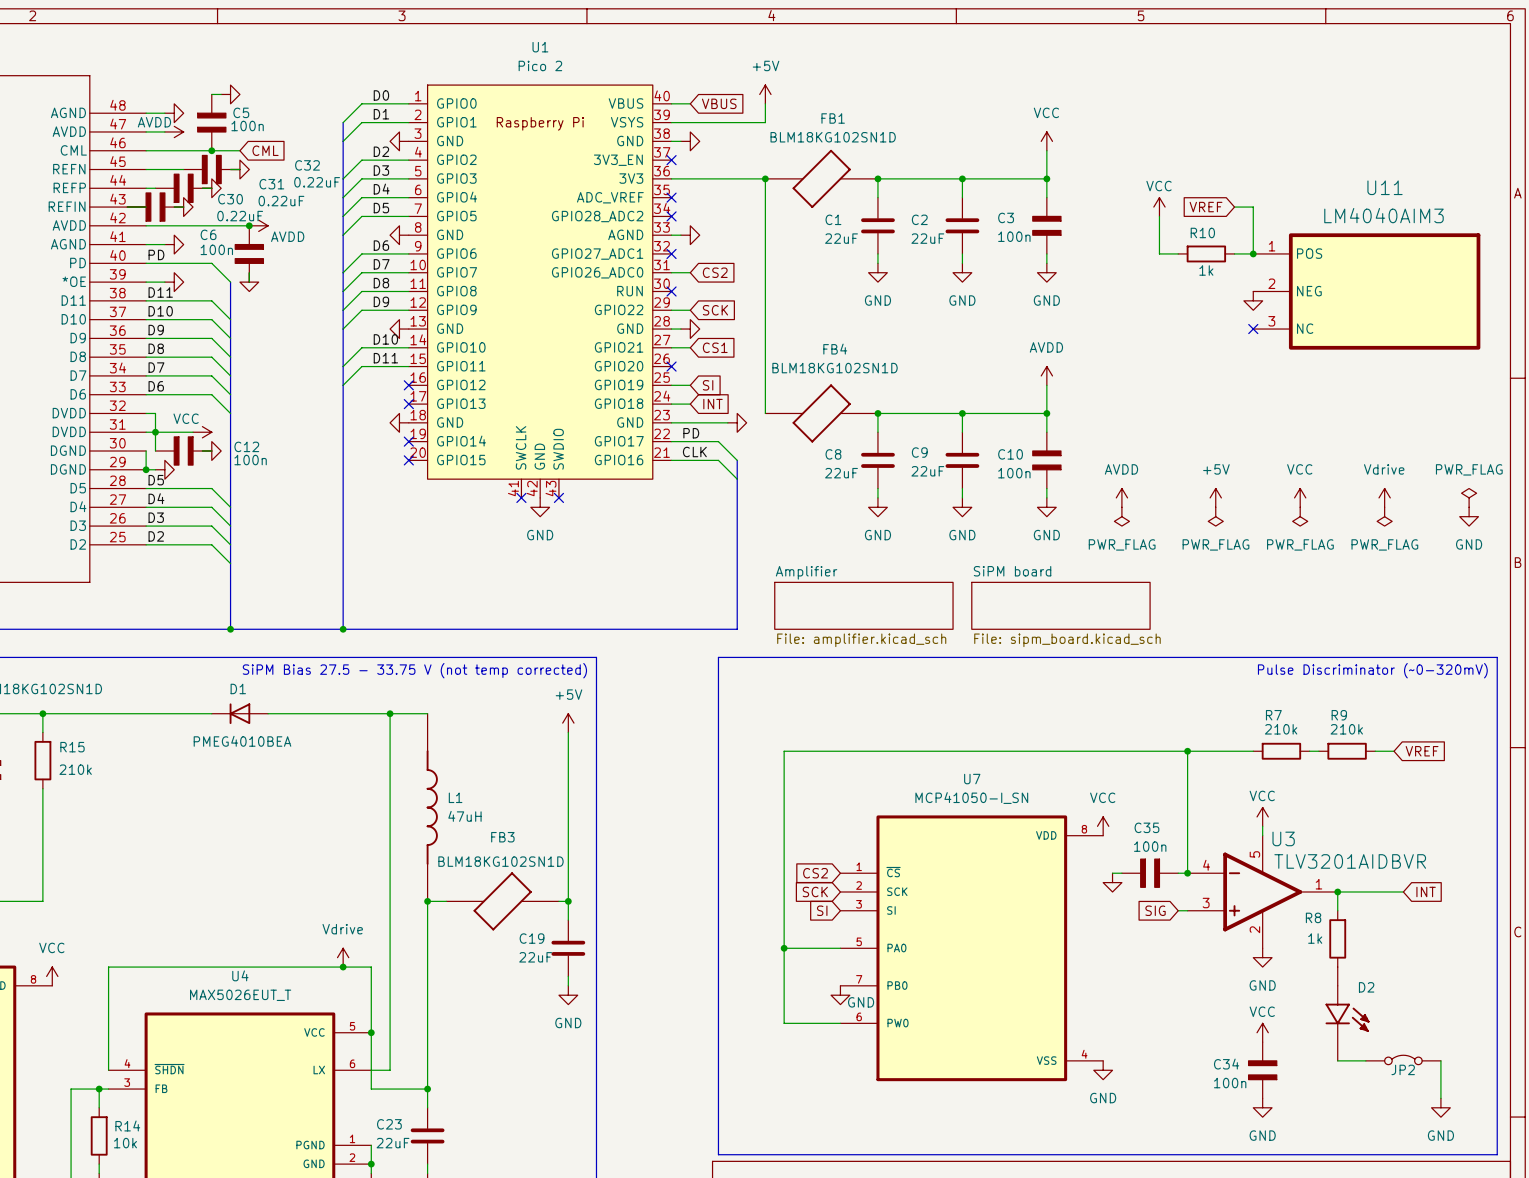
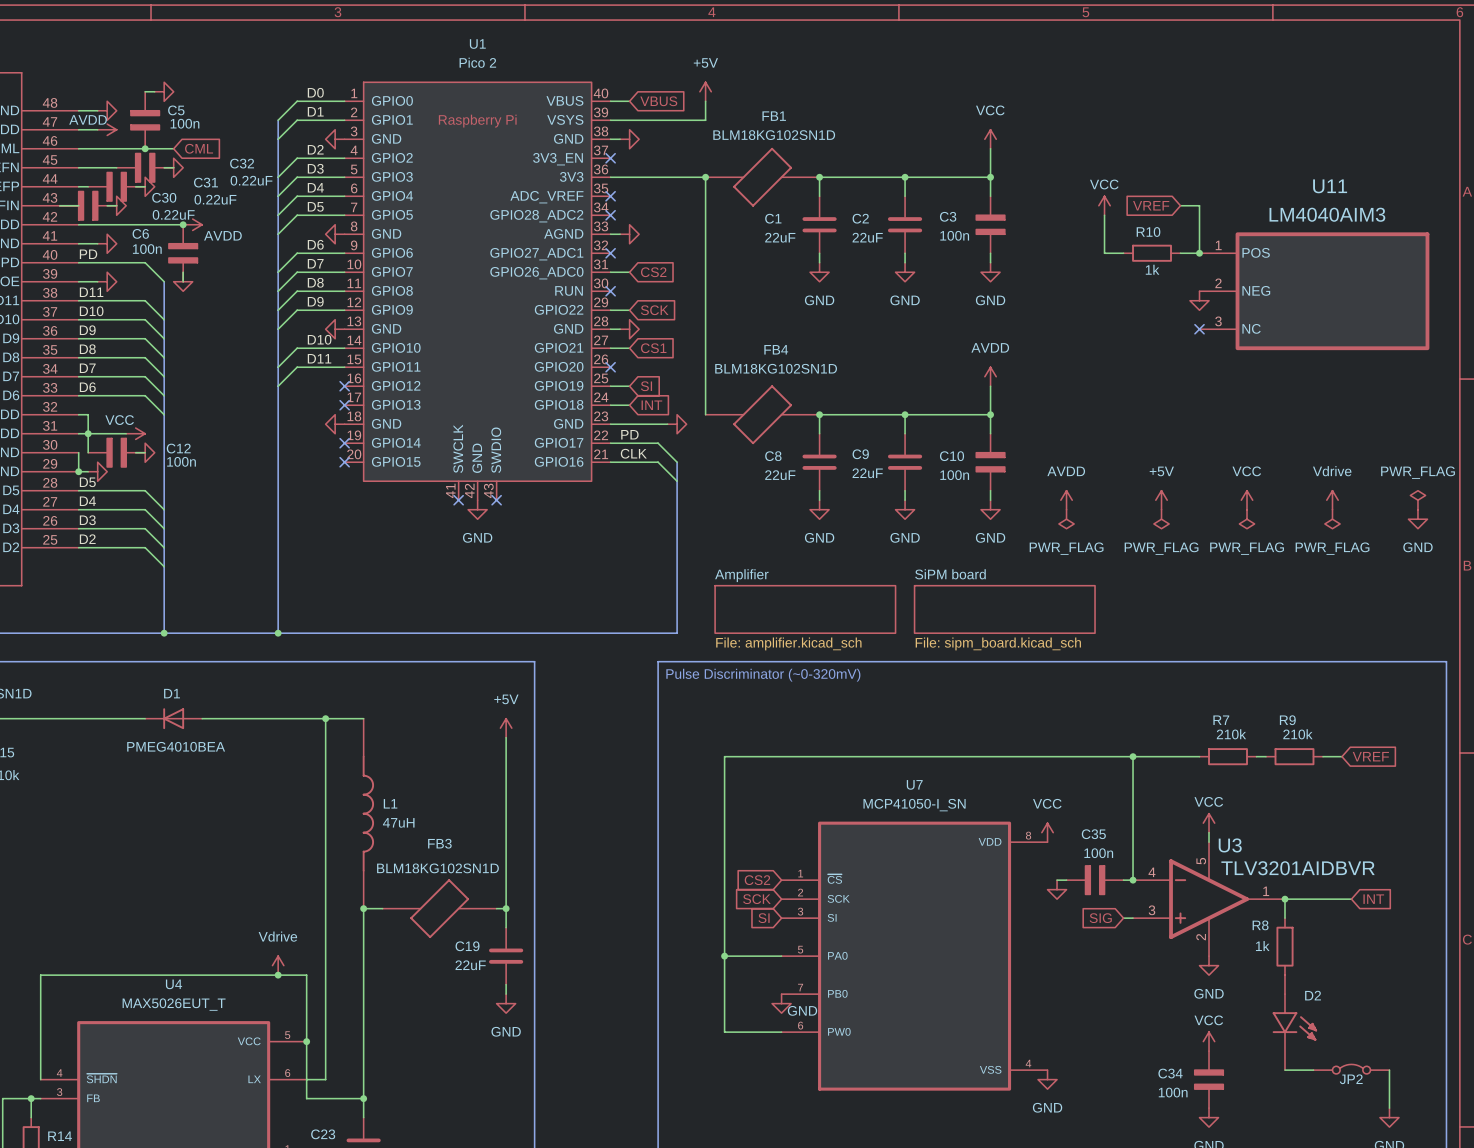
text: SiPM Bias 27.5 - 33.75 V (not temp corrected) (414, 670) -> none
text: none -> Pulse Discriminator (~0-320mV) (763, 675)
text: Pulse Discriminator (~0-320mV) (1372, 670) -> none

